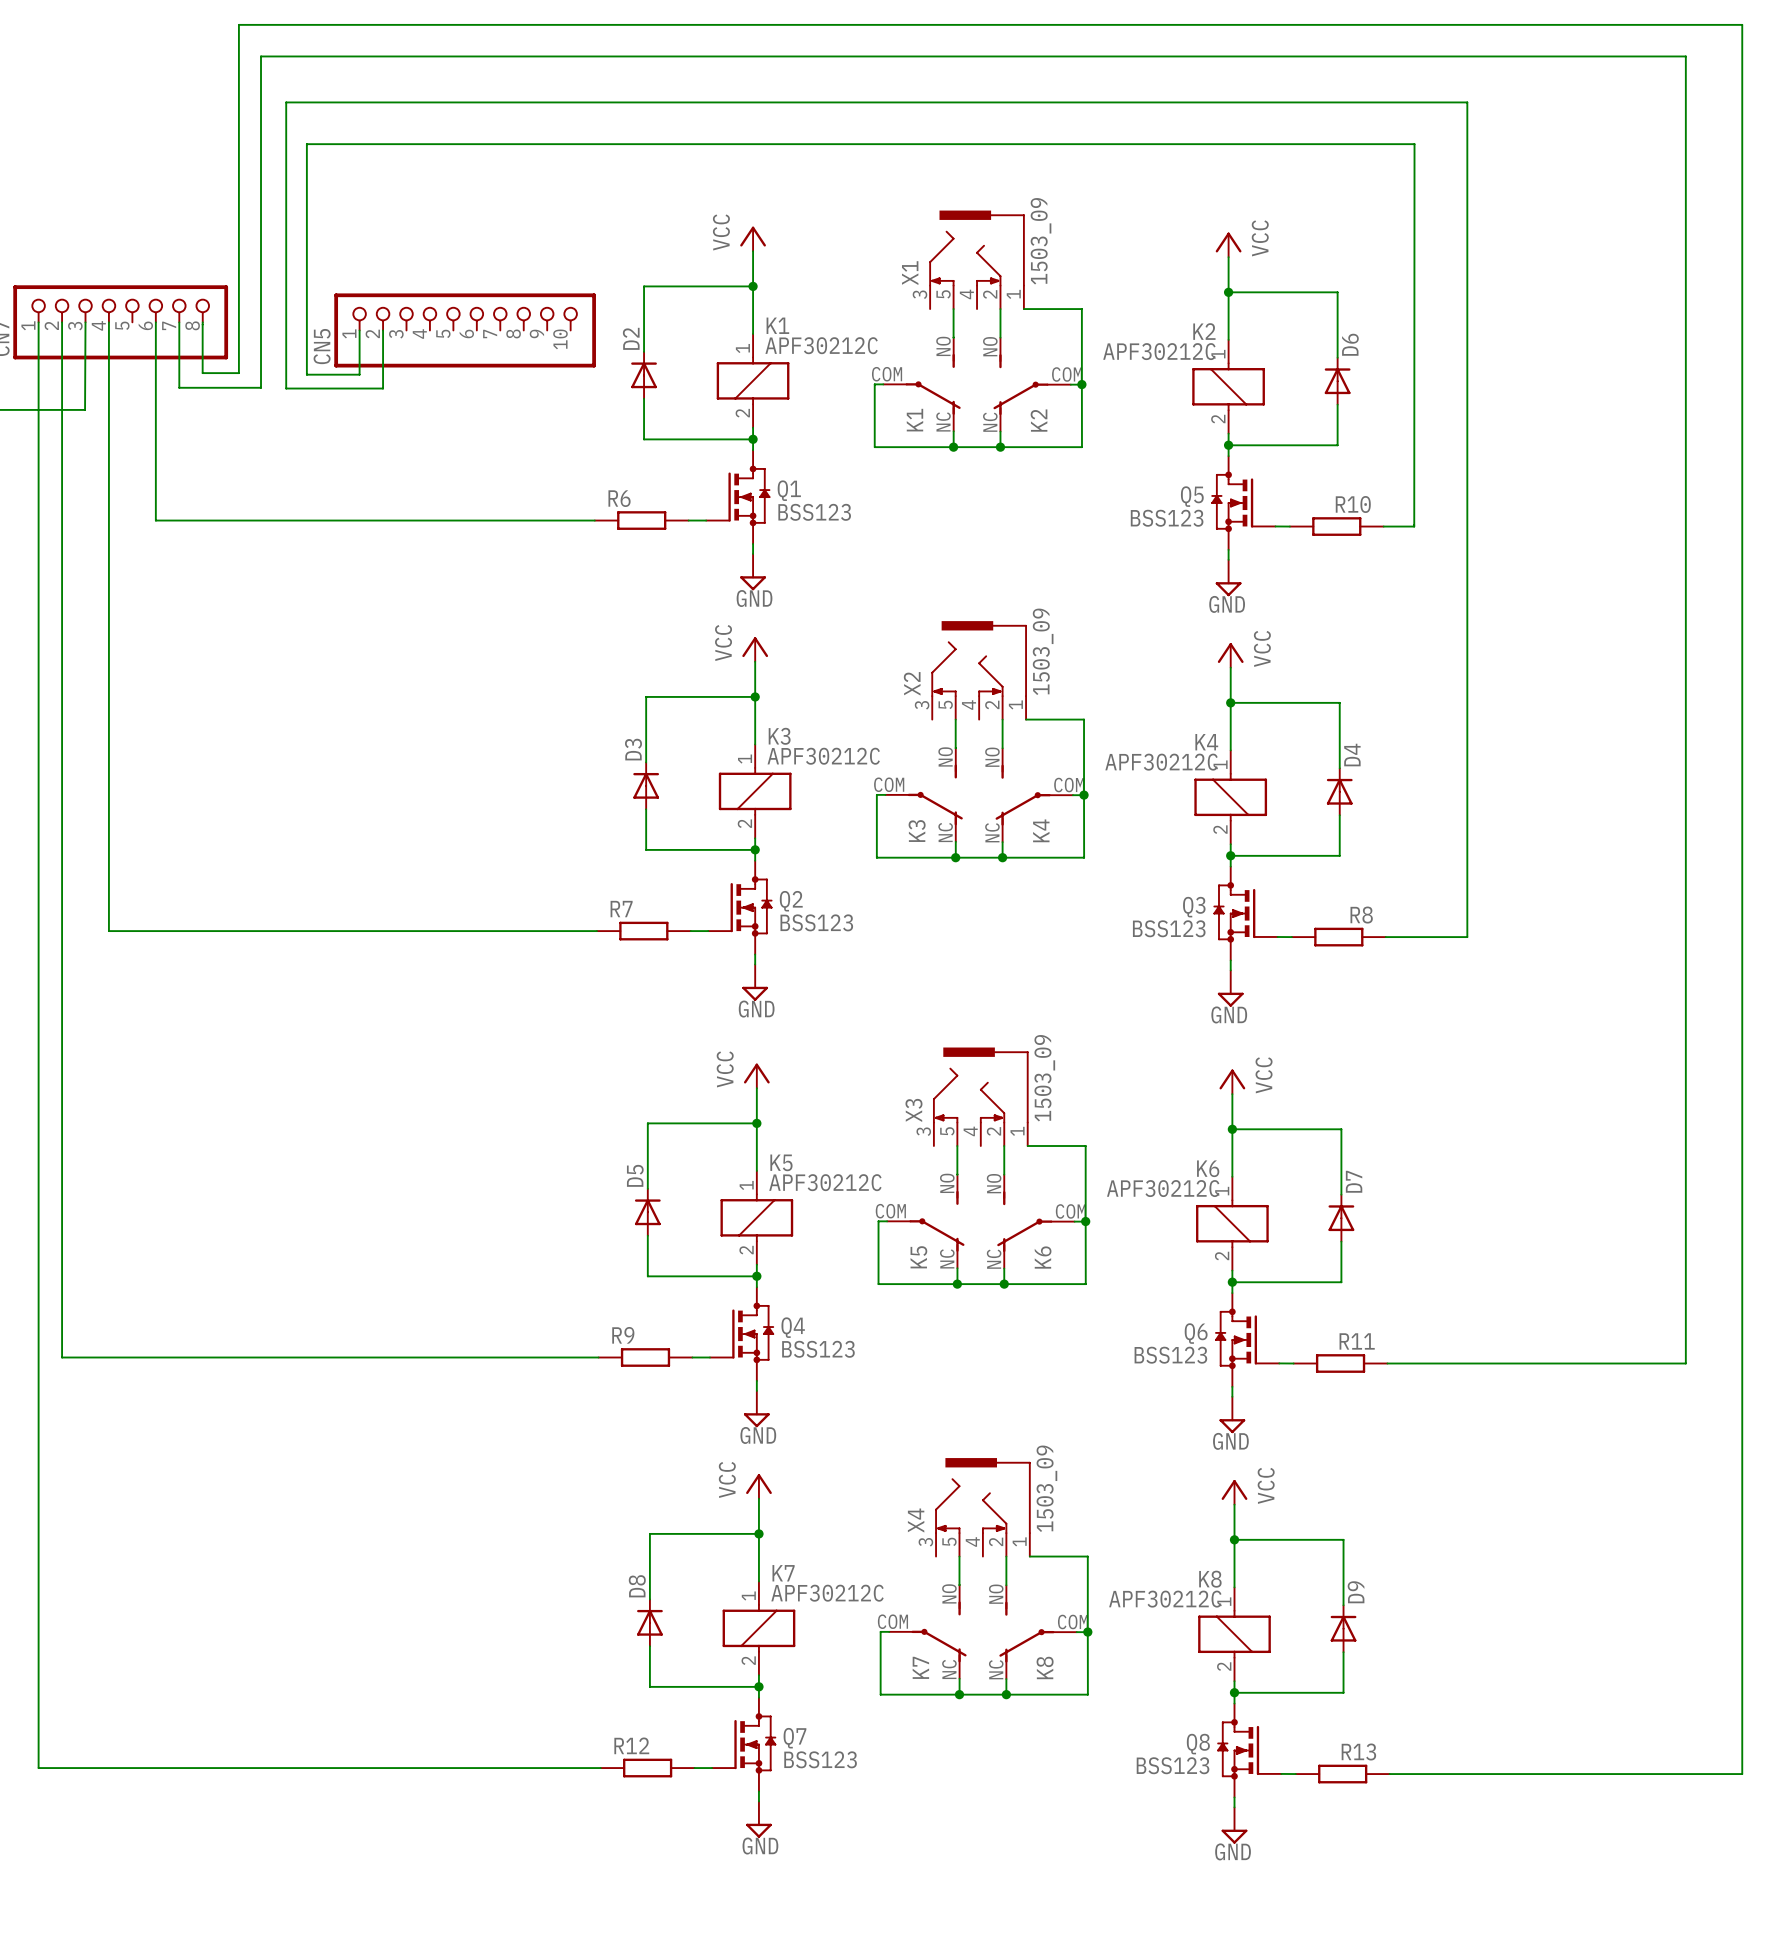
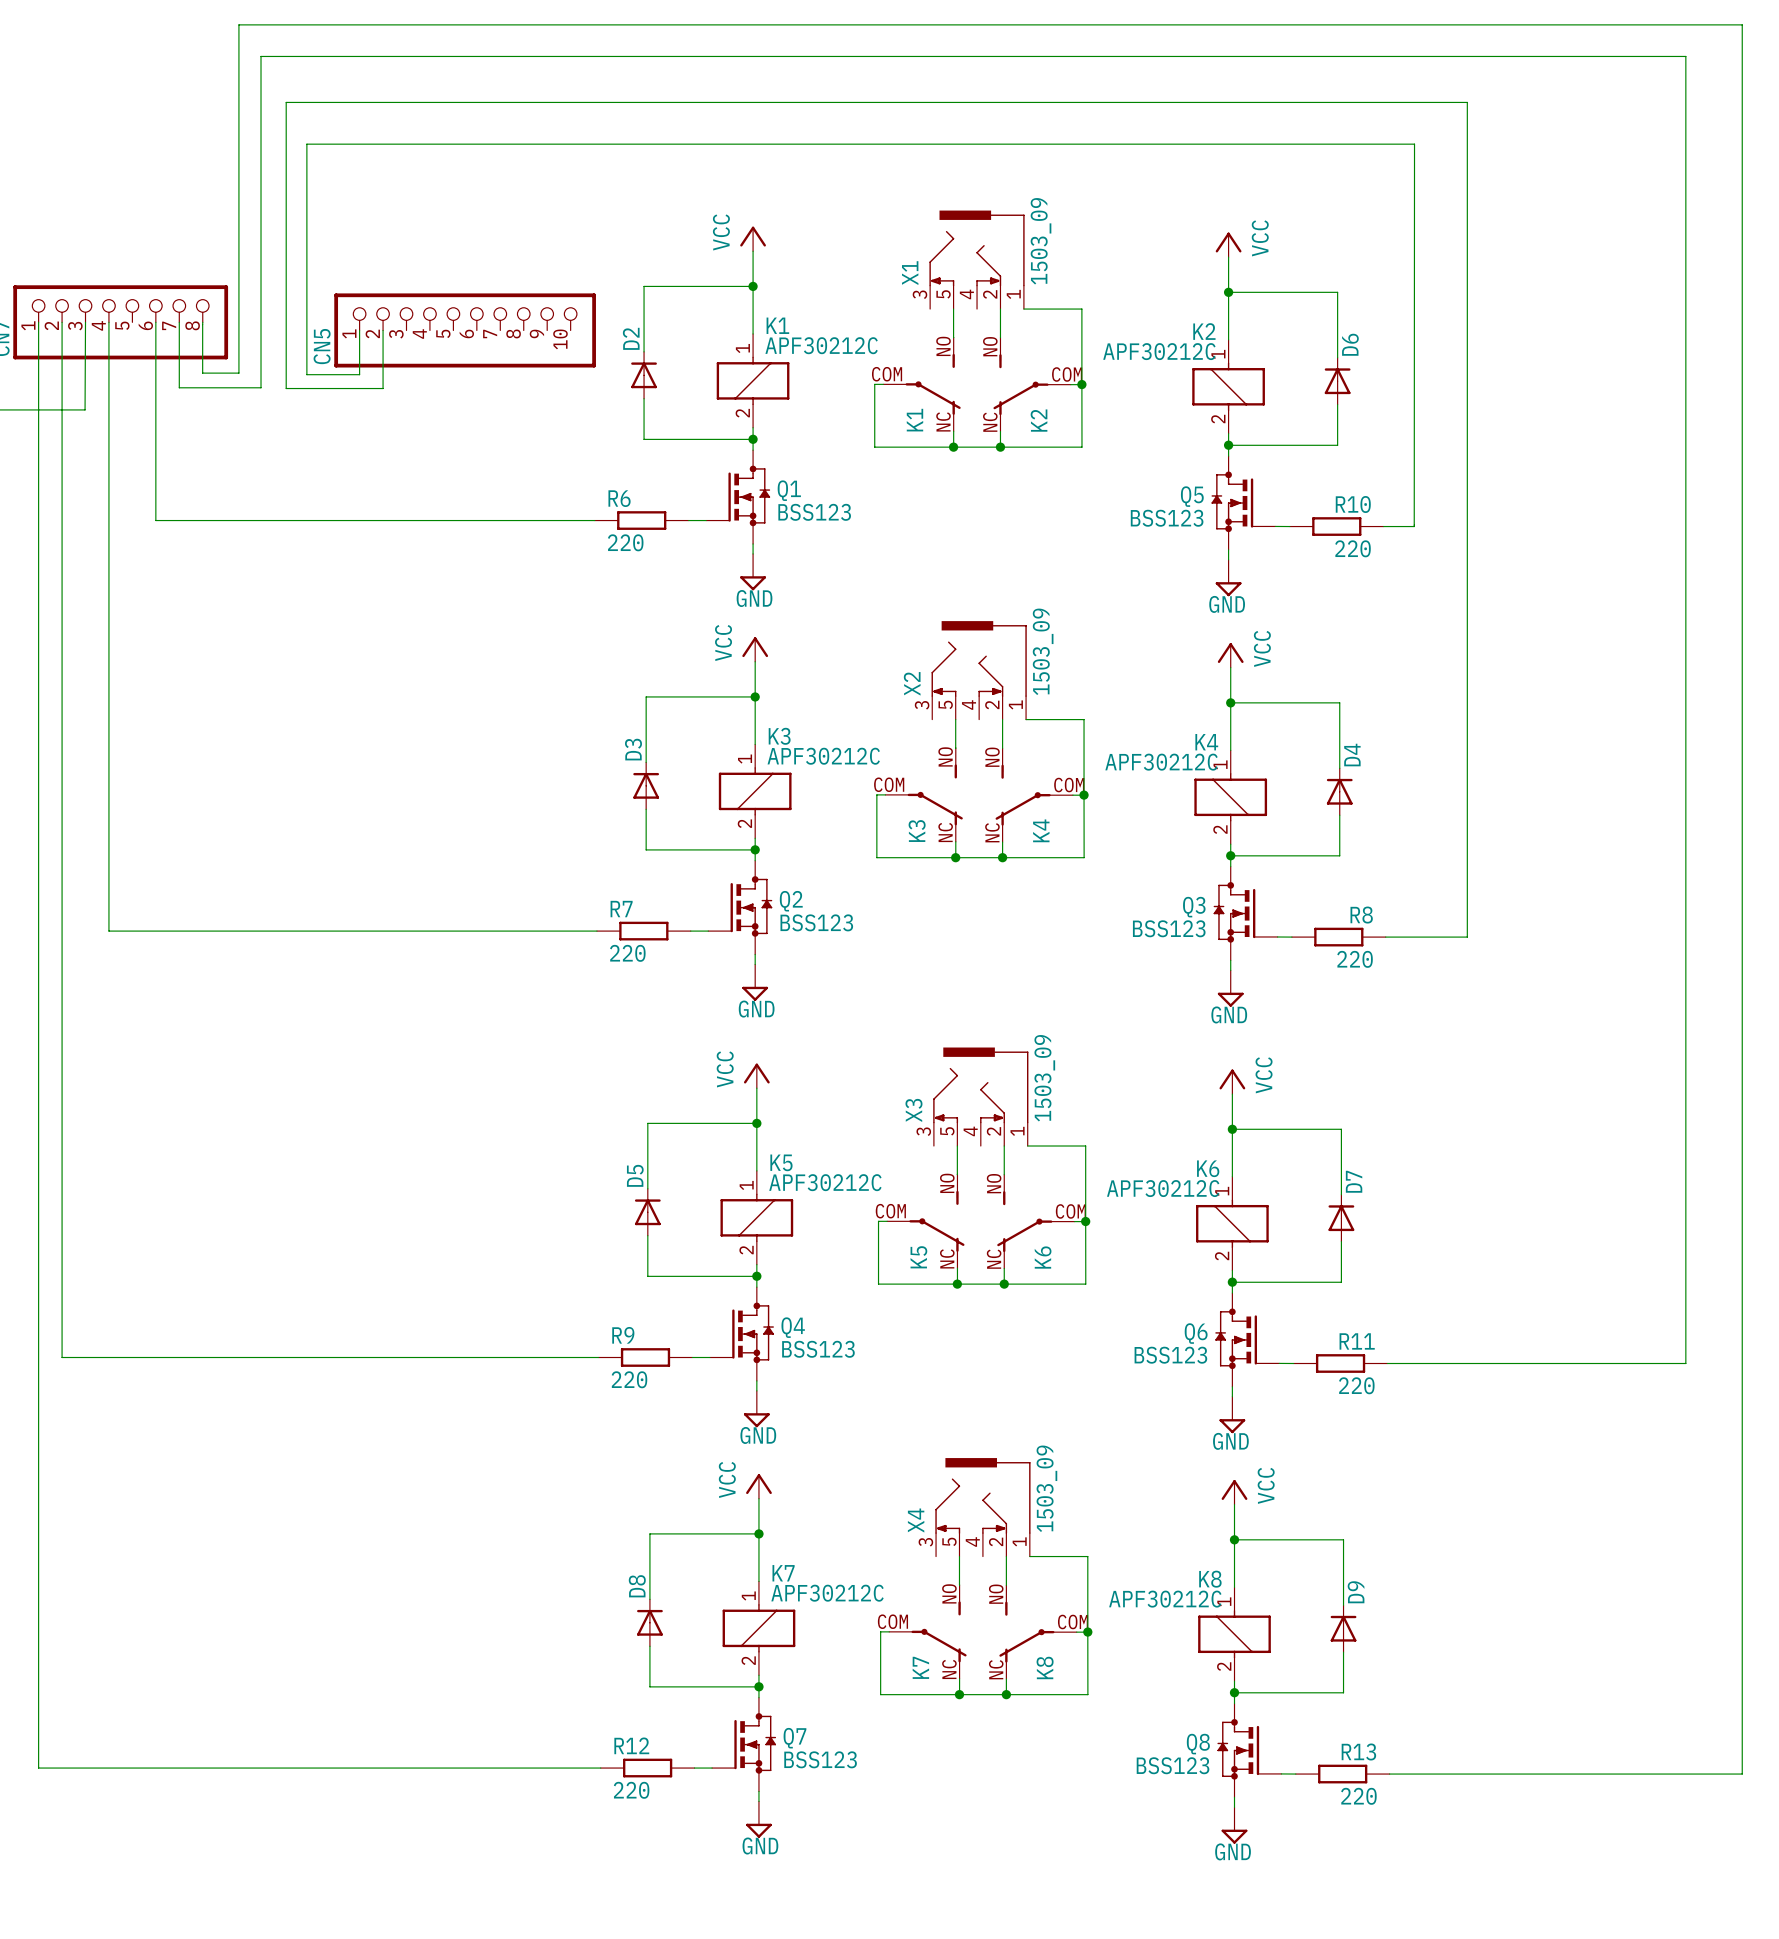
R6 value: none -> 220 (625, 542)
R10 value: none -> 220 (1353, 548)
R7 value: none -> 220 (627, 953)
R8 value: none -> 220 (1355, 959)
R9 value: none -> 220 (629, 1379)
R11 value: none -> 220 (1356, 1385)
R12 value: none -> 220 (631, 1790)
R13 value: none -> 220 (1358, 1796)

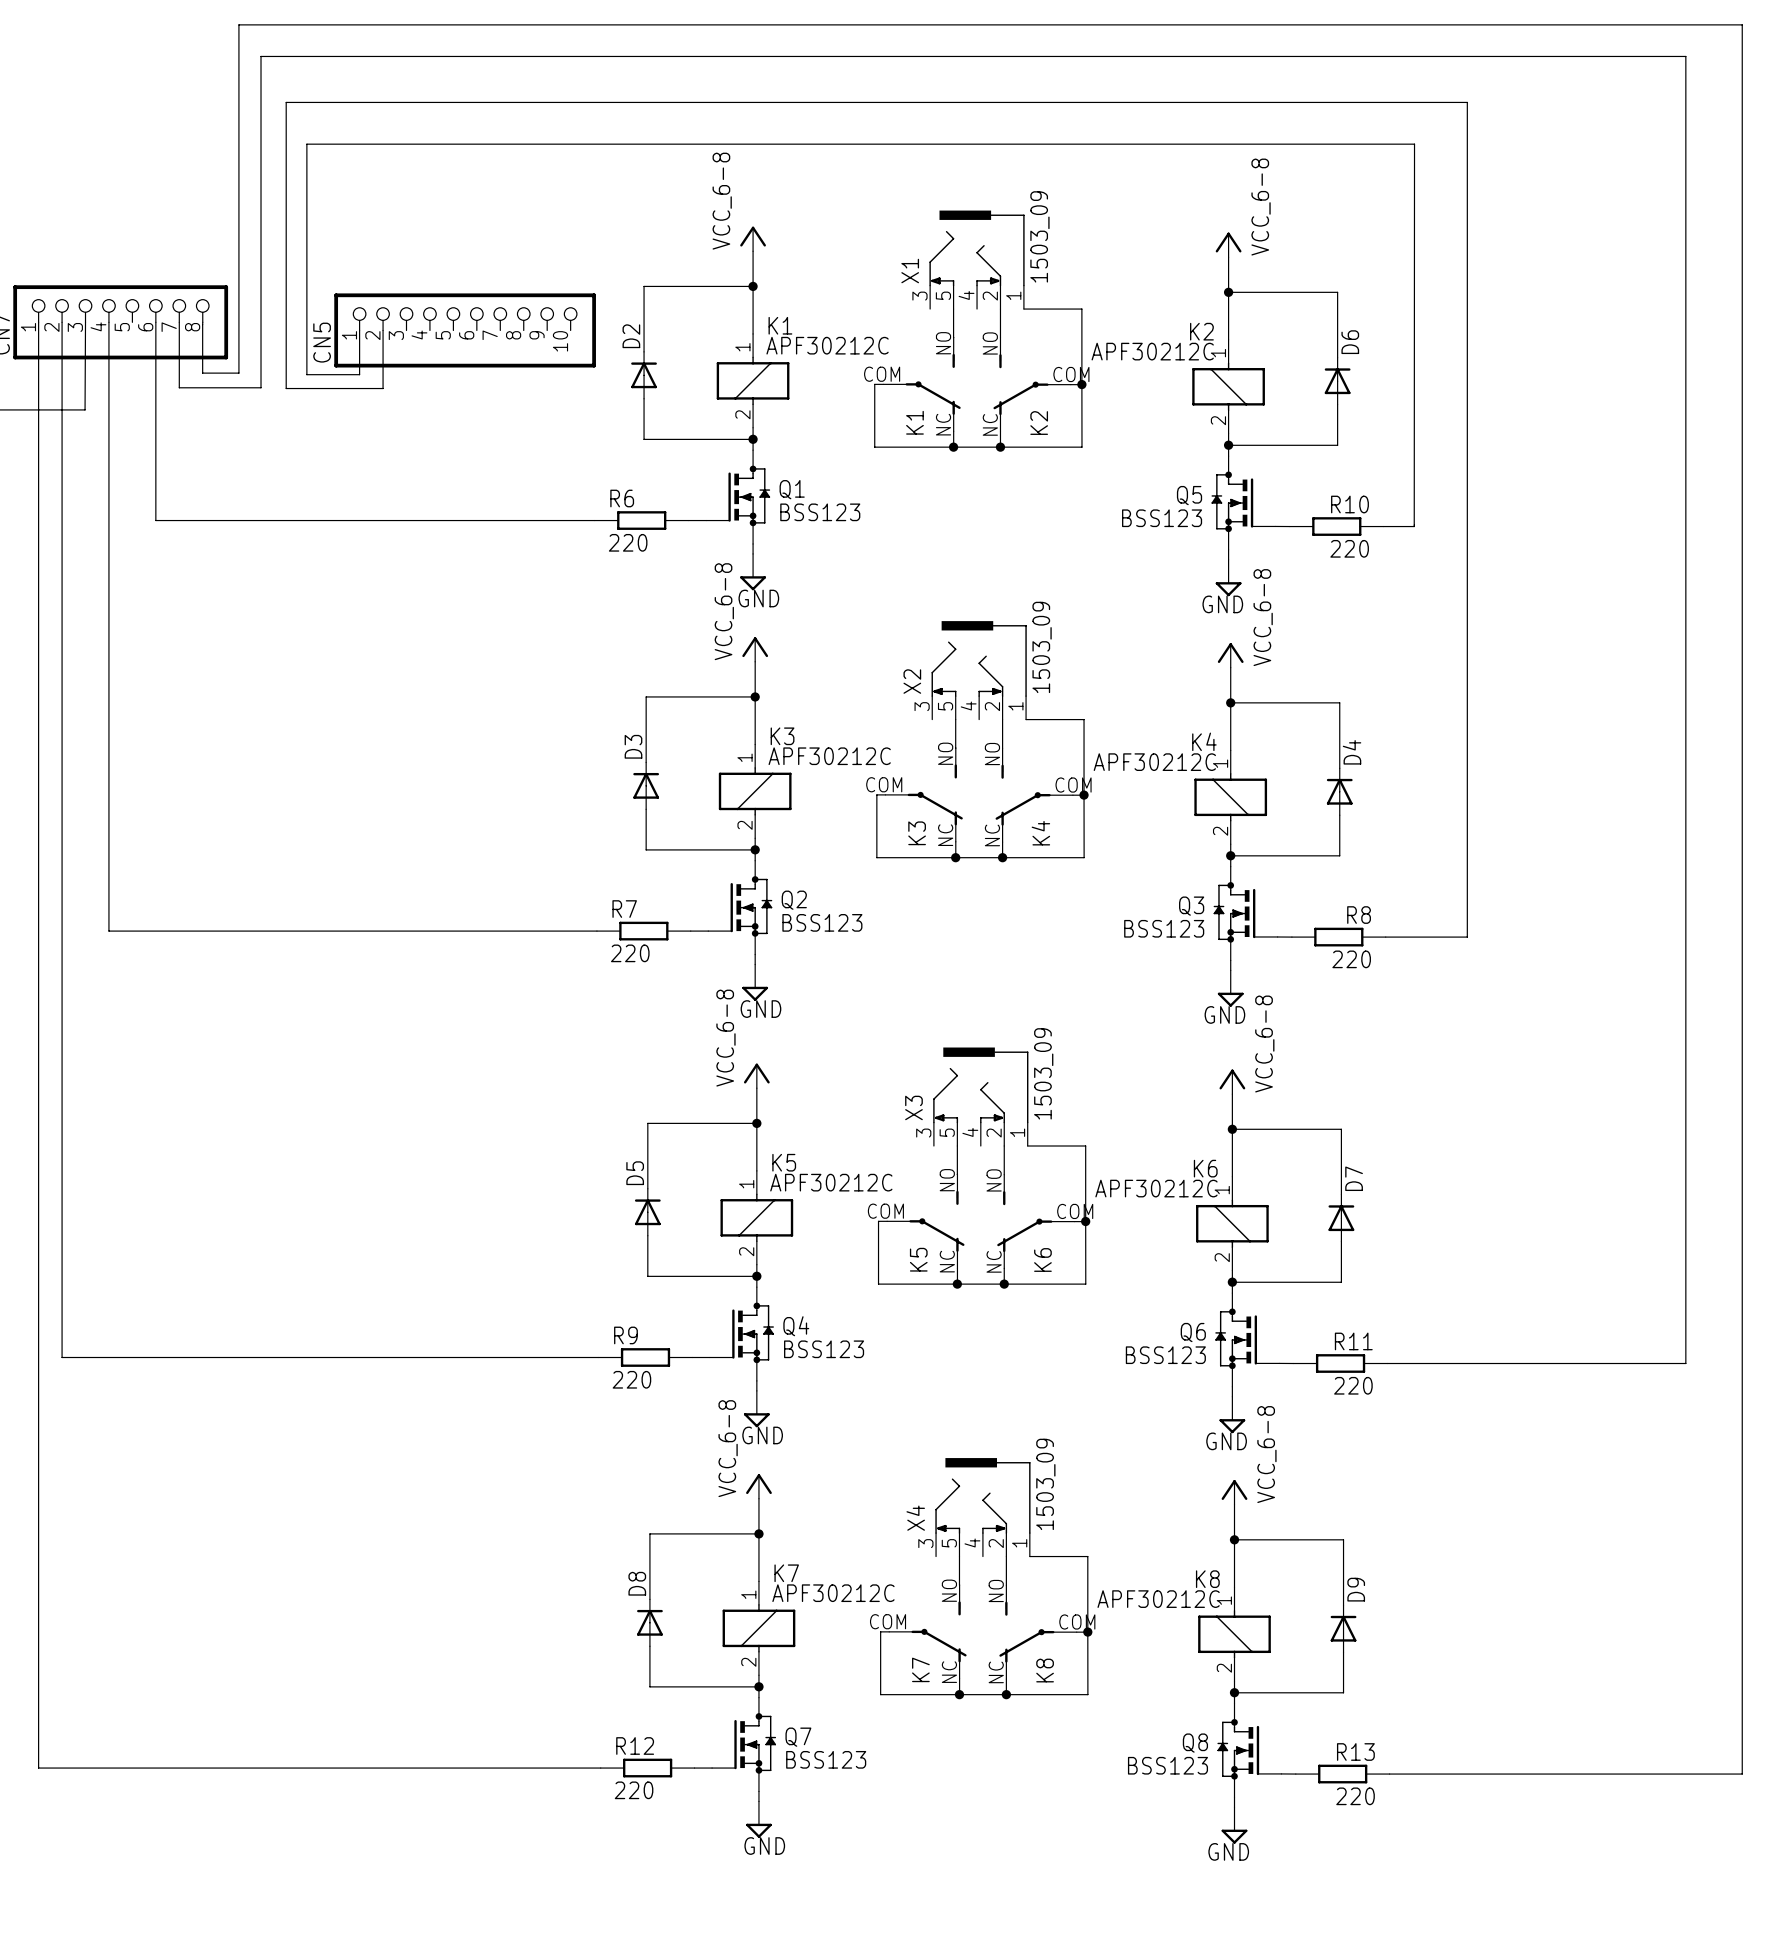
power symbol: VCC (753, 238) -> VCC_6-8 (753, 238)
power symbol: VCC (1228, 244) -> VCC_6-8 (1228, 244)
power symbol: VCC (755, 649) -> VCC_6-8 (755, 649)
power symbol: VCC (1230, 655) -> VCC_6-8 (1230, 655)
power symbol: VCC (756, 1075) -> VCC_6-8 (756, 1075)
power symbol: VCC (1232, 1081) -> VCC_6-8 (1232, 1081)
power symbol: VCC (758, 1486) -> VCC_6-8 (758, 1486)
power symbol: VCC (1234, 1492) -> VCC_6-8 (1234, 1492)

